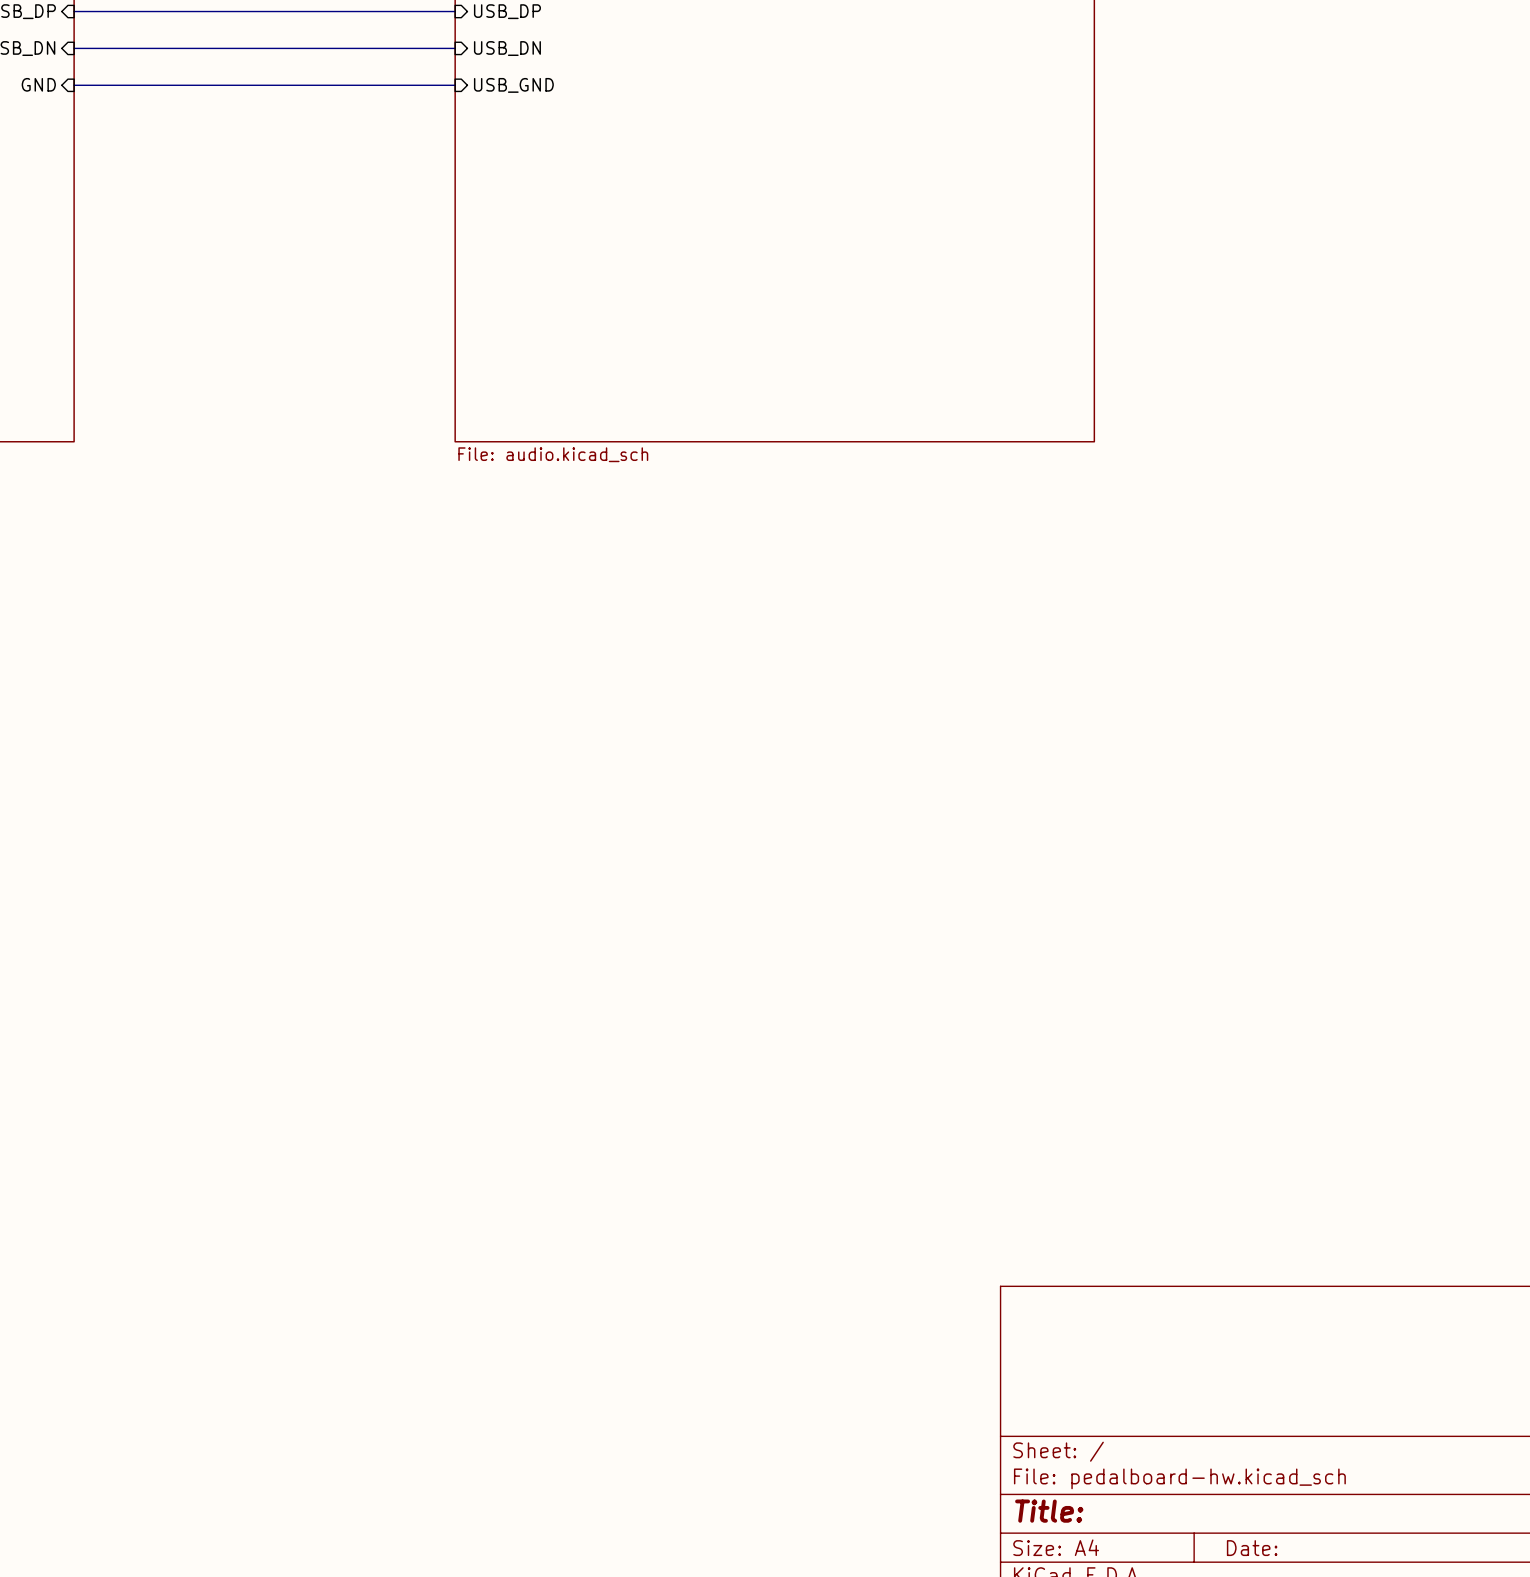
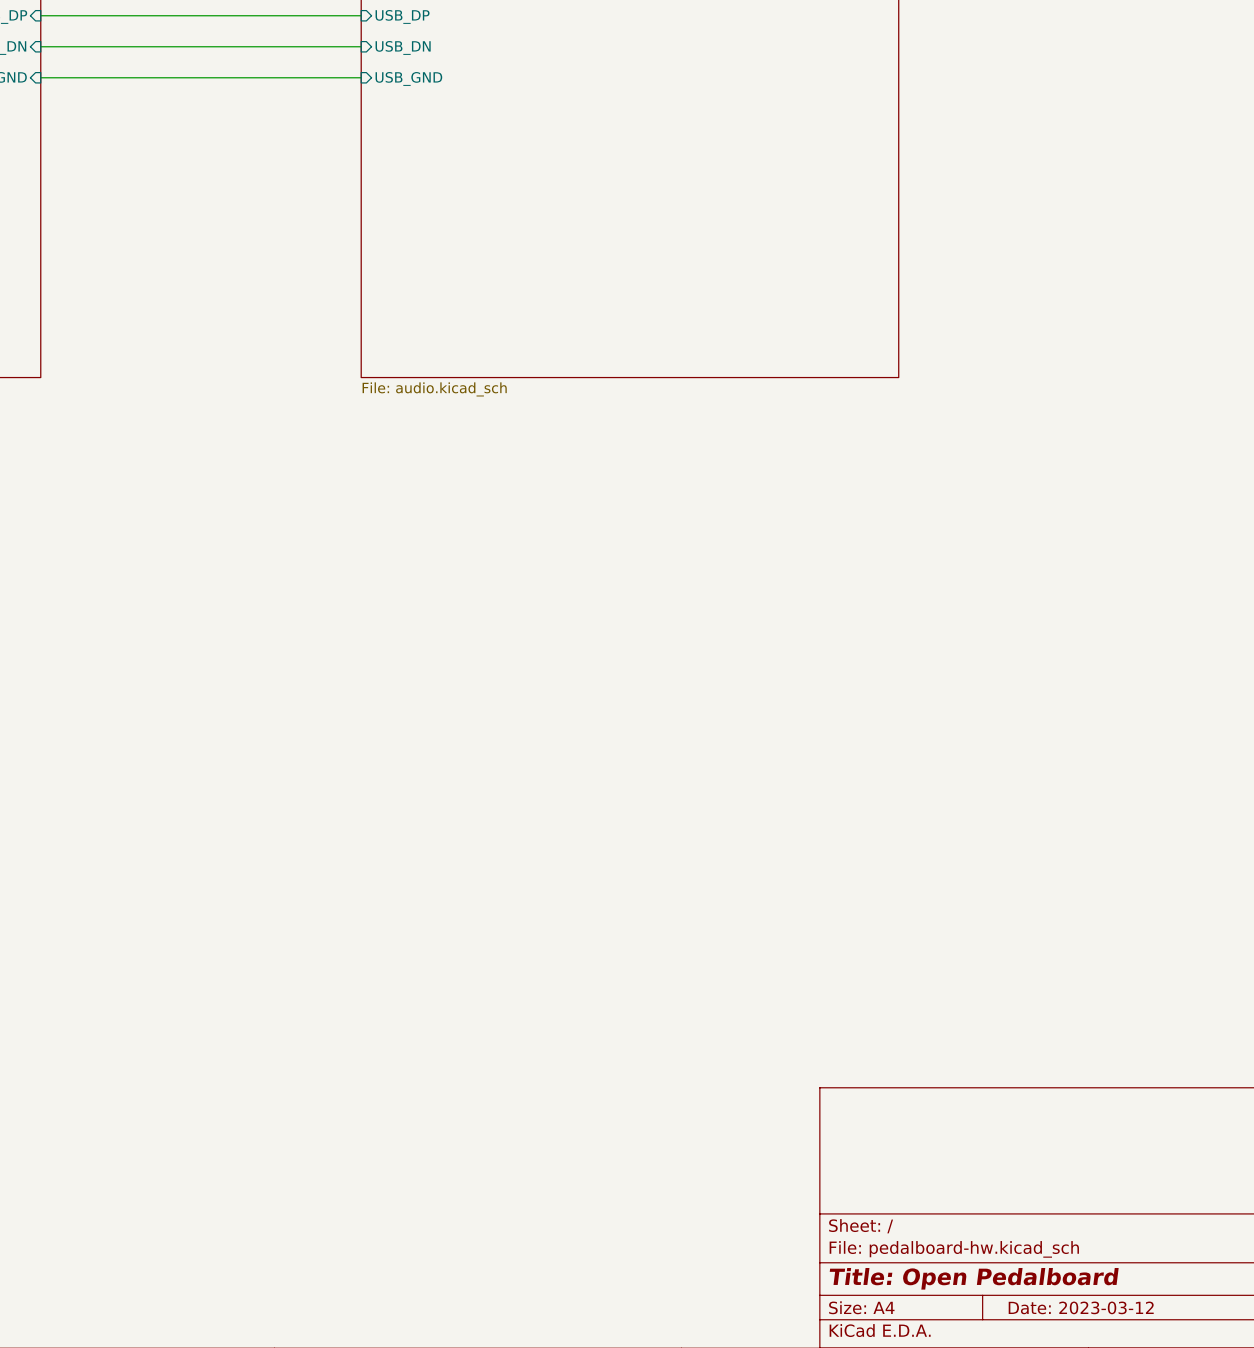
title block: Title: (1049, 1511) -> Title: Open Pedalboard (974, 1278)
title block: Date: (1252, 1548) -> Date: 2023-03-12 (1081, 1307)

